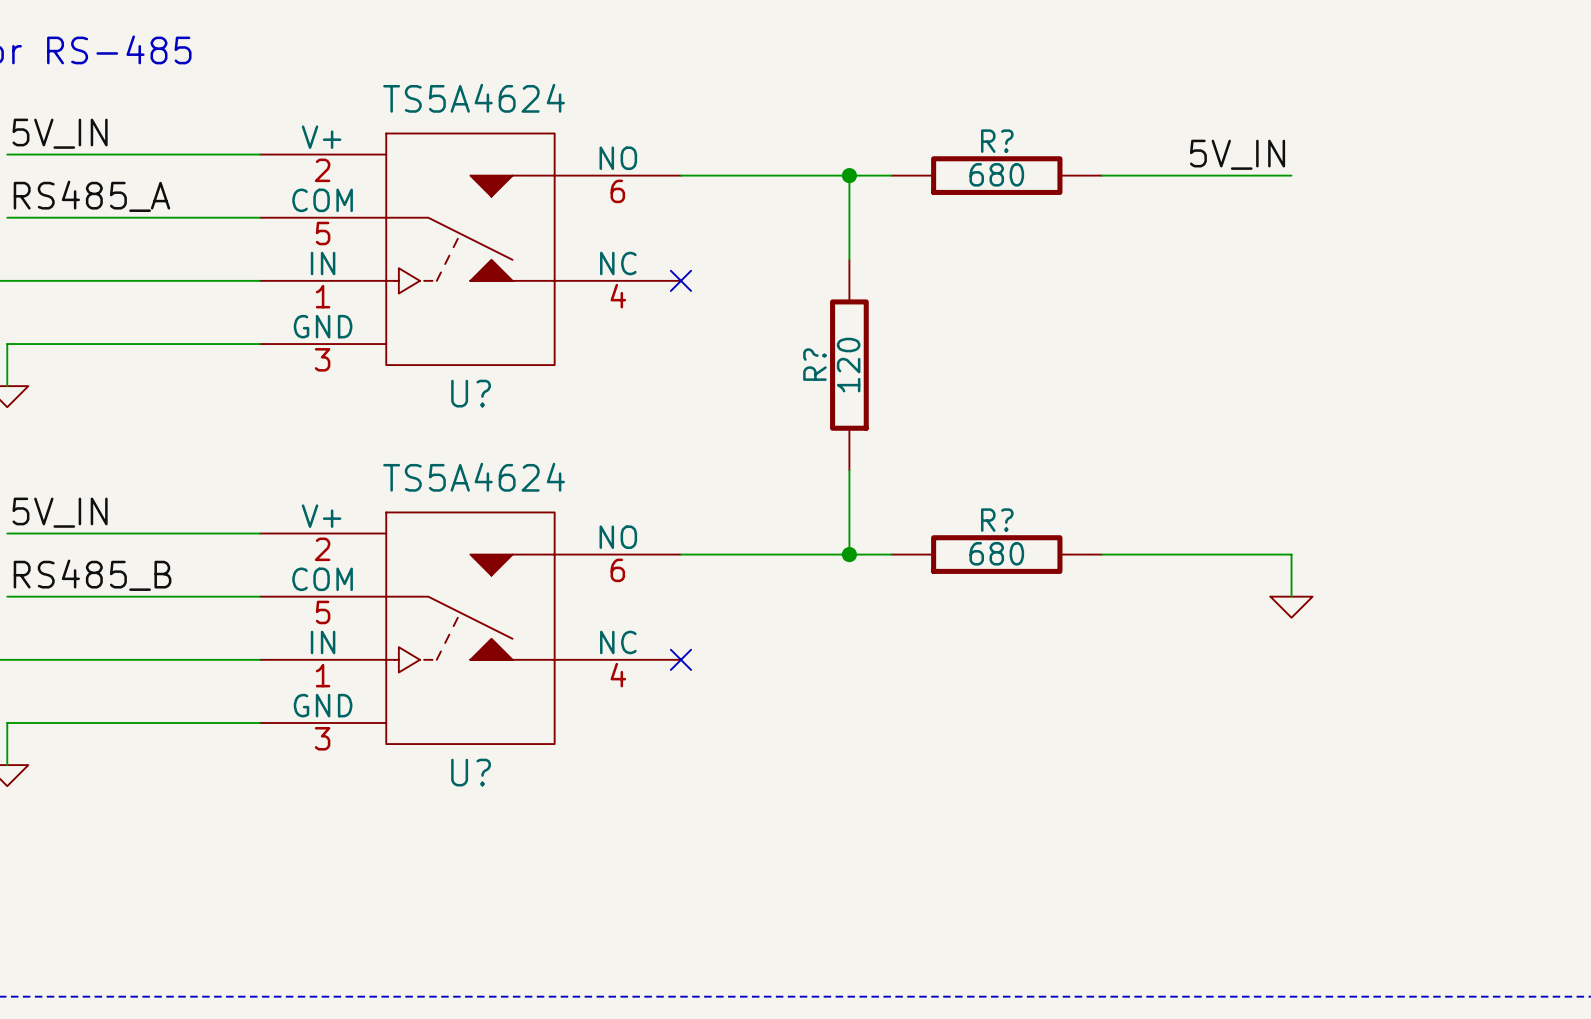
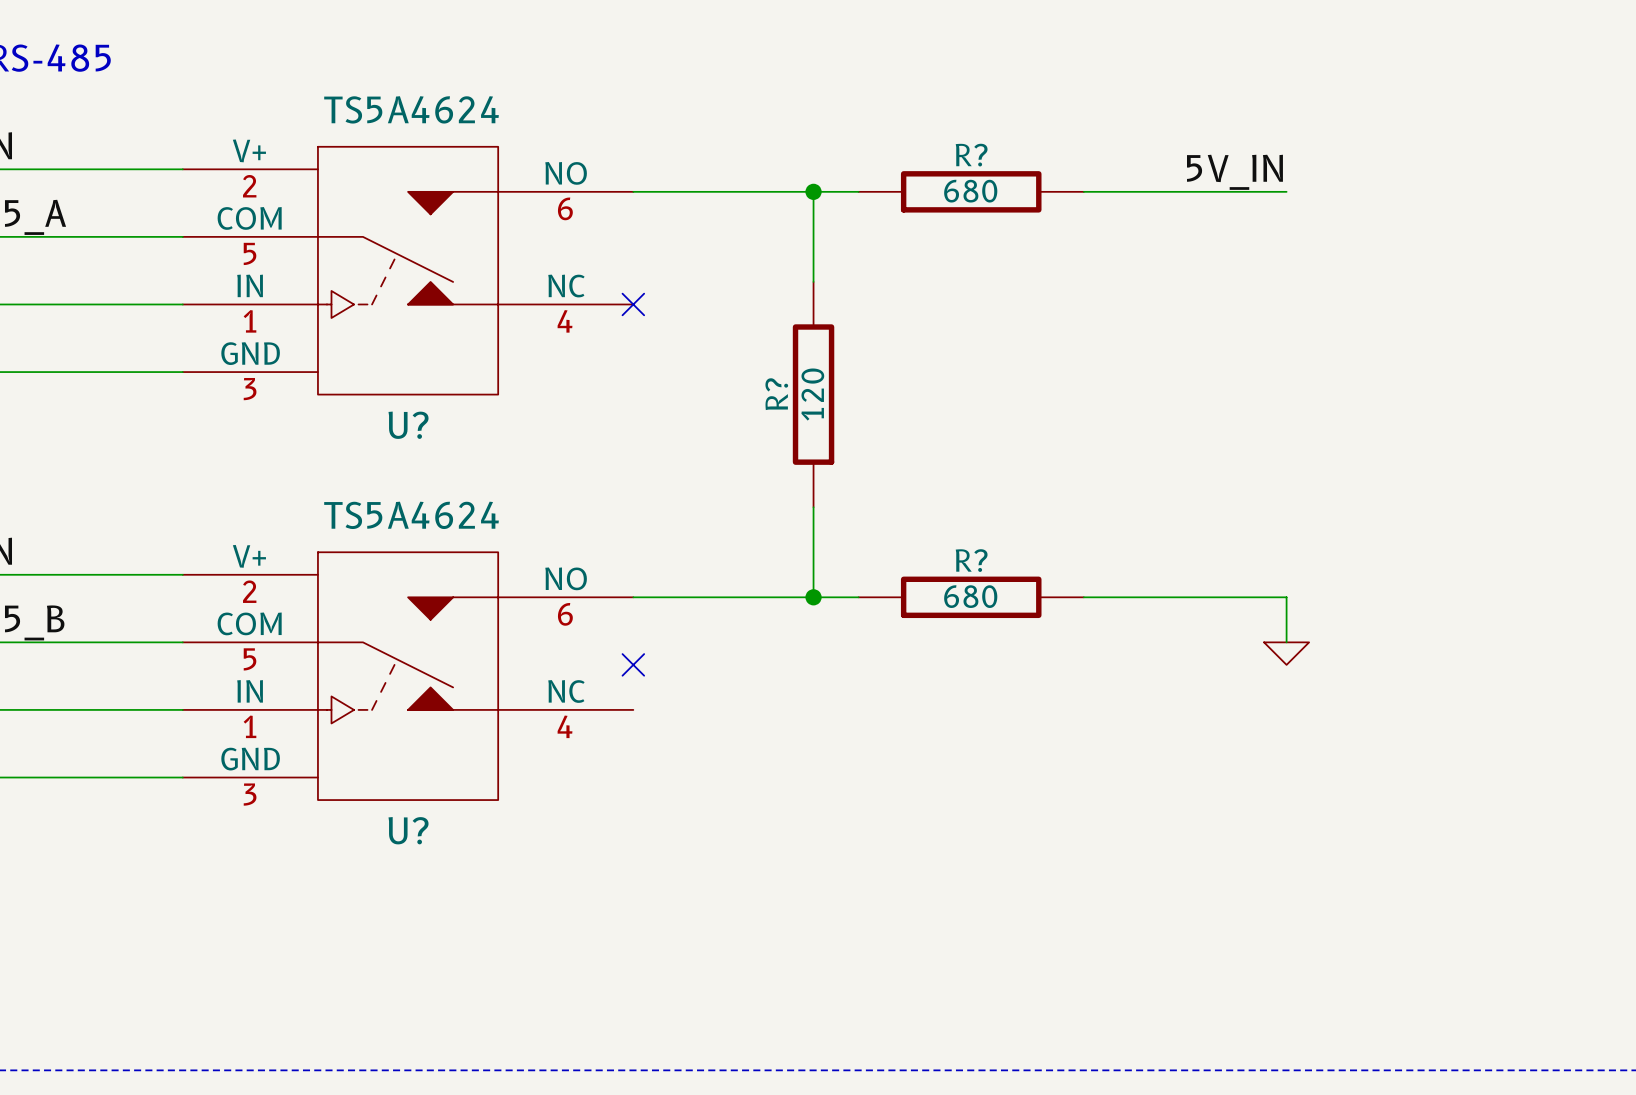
no-connect mark position: (680, 659) -> (633, 664)

